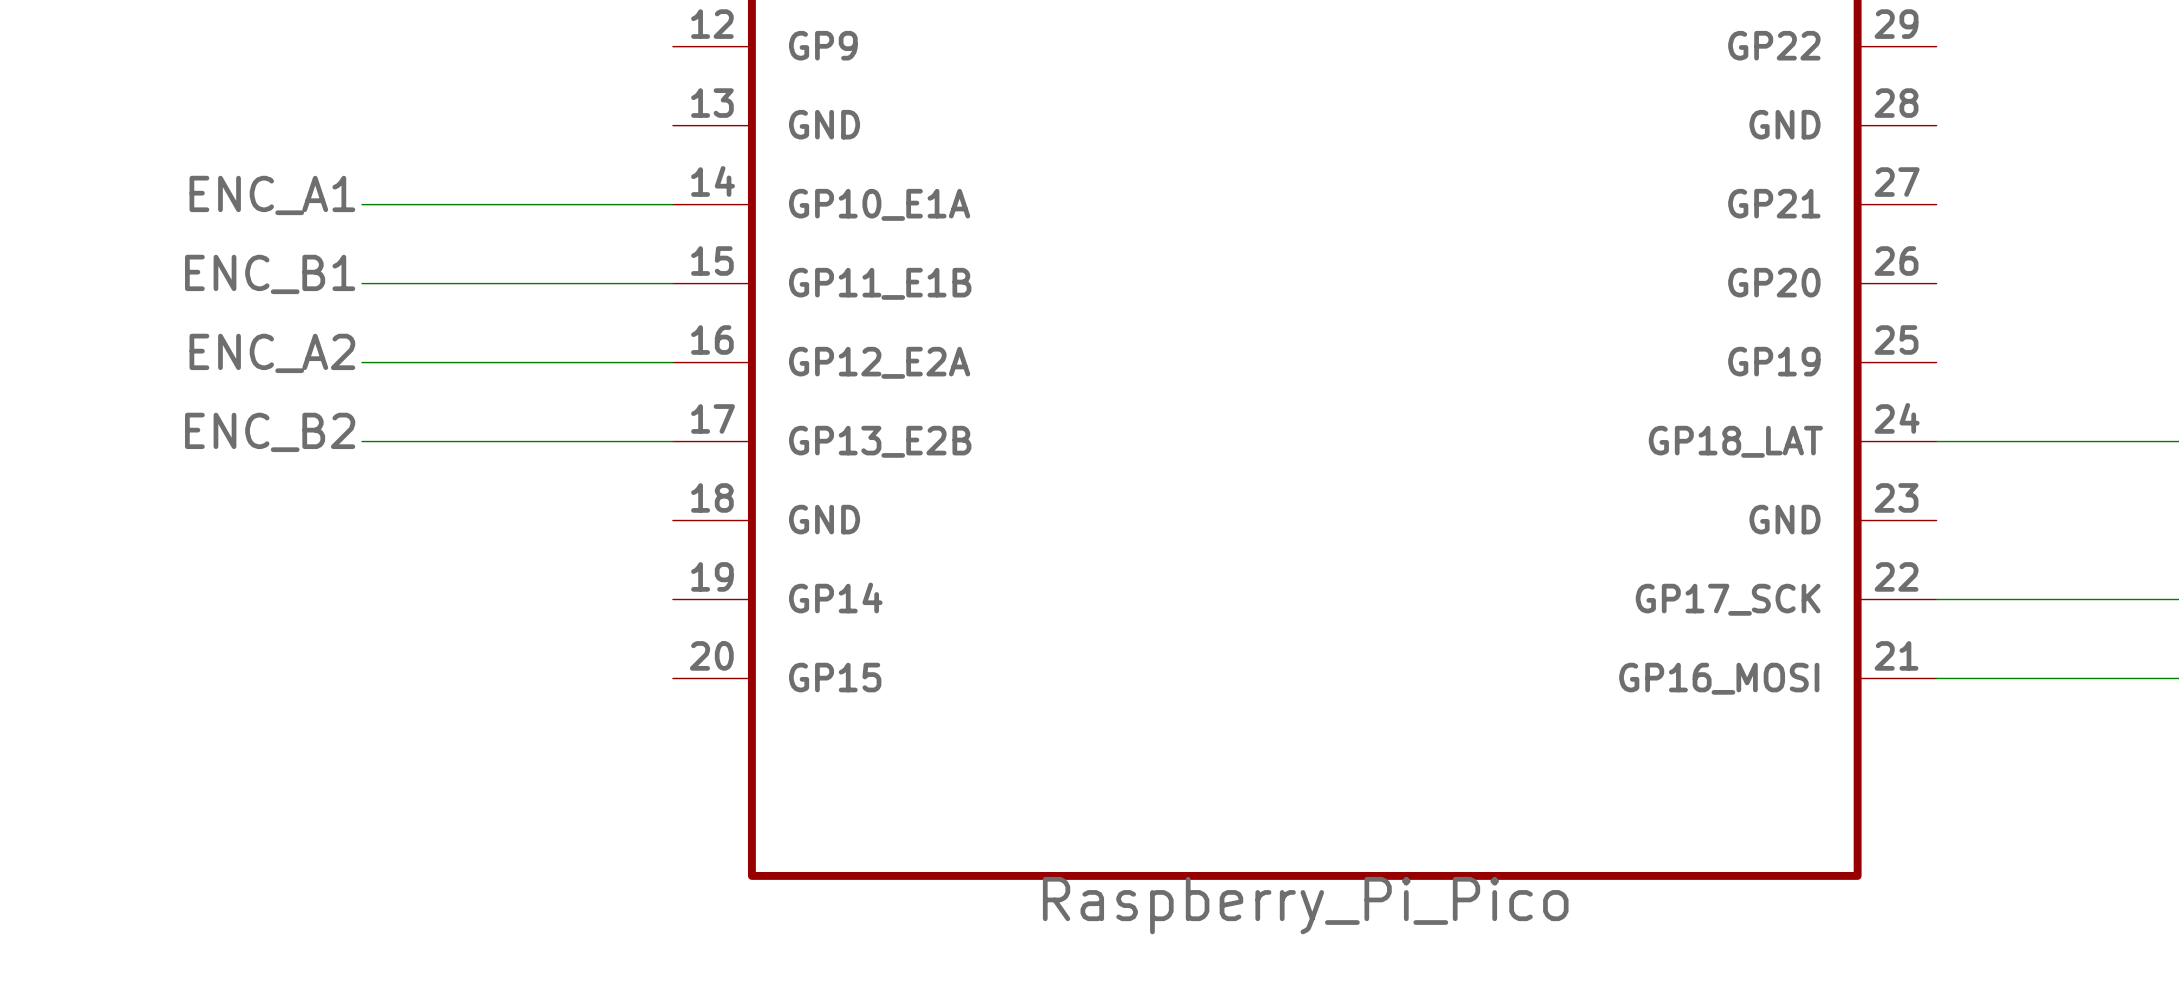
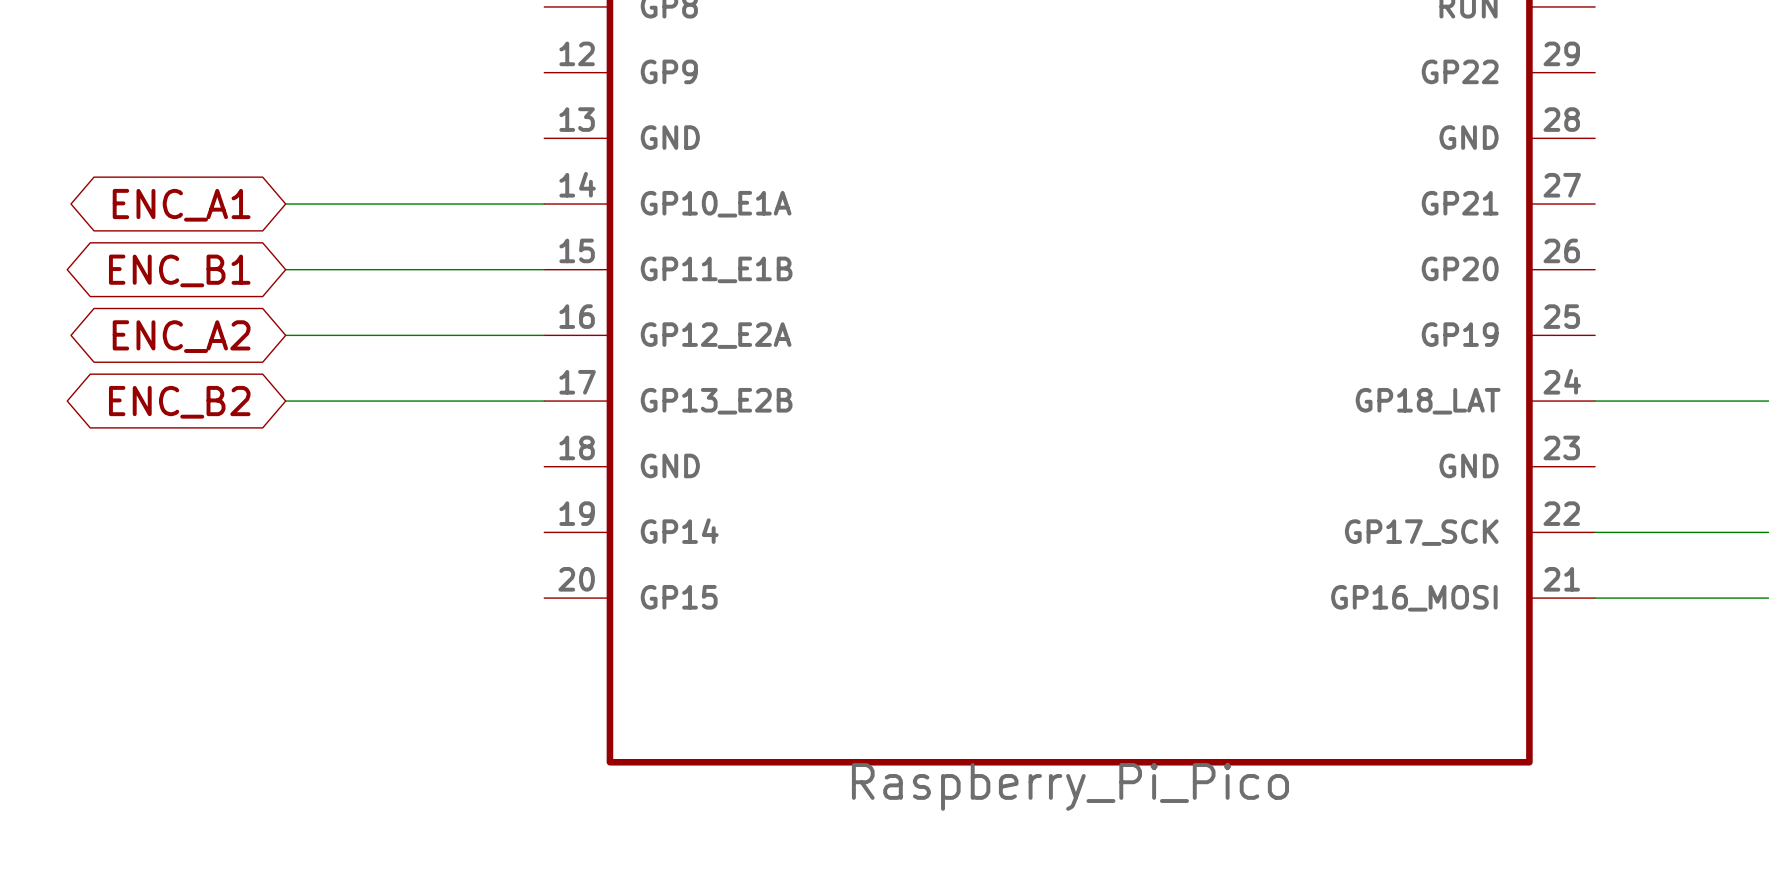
label: ENC_A1 (272, 195) -> none
global label: none -> ENC_A1 (181, 205)
label: ENC_B1 (270, 274) -> none
global label: none -> ENC_B1 (179, 270)
label: ENC_A2 (272, 353) -> none
global label: none -> ENC_A2 (181, 336)
label: ENC_B2 (270, 432) -> none
global label: none -> ENC_B2 (179, 402)

